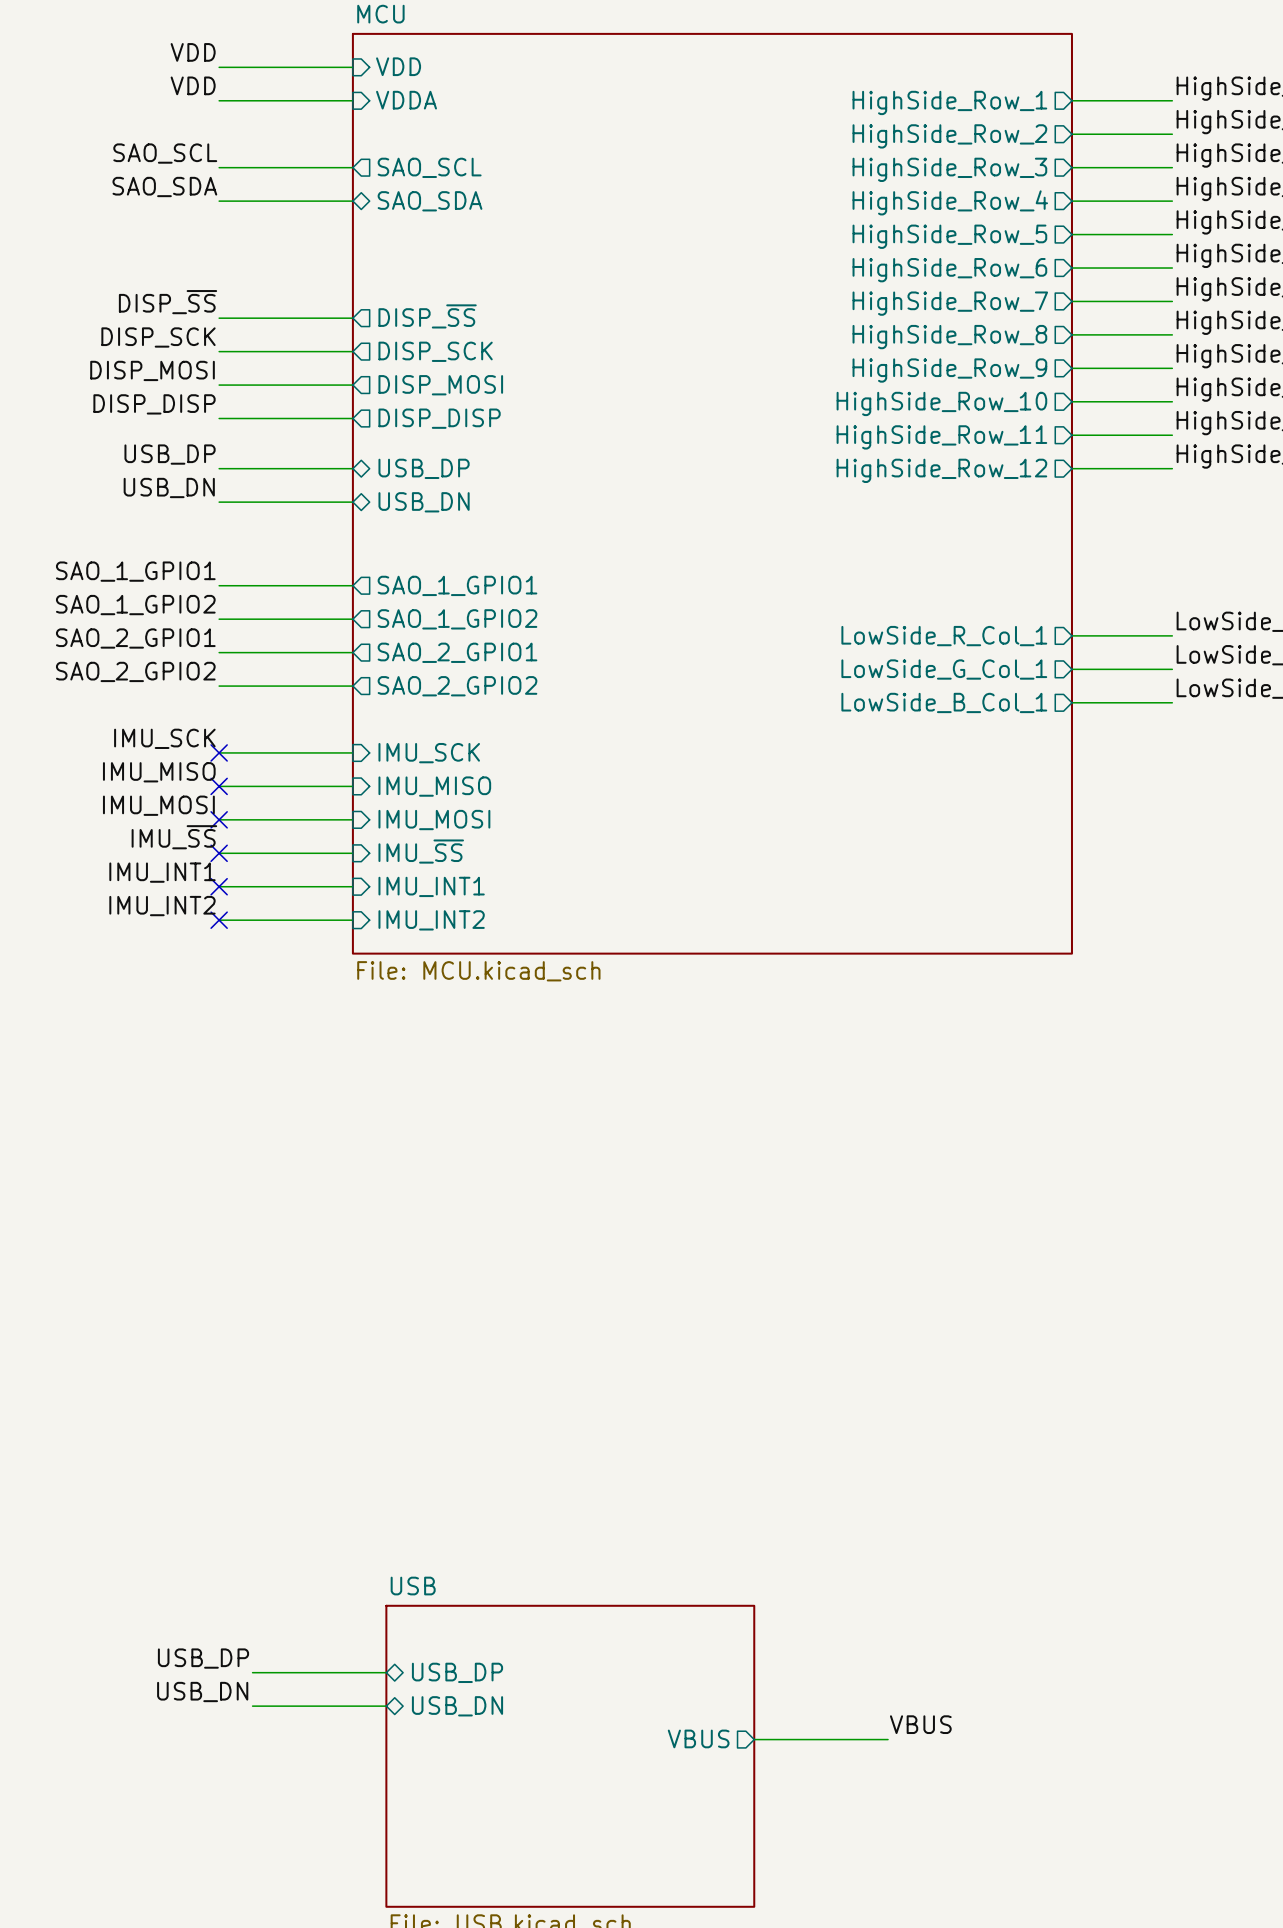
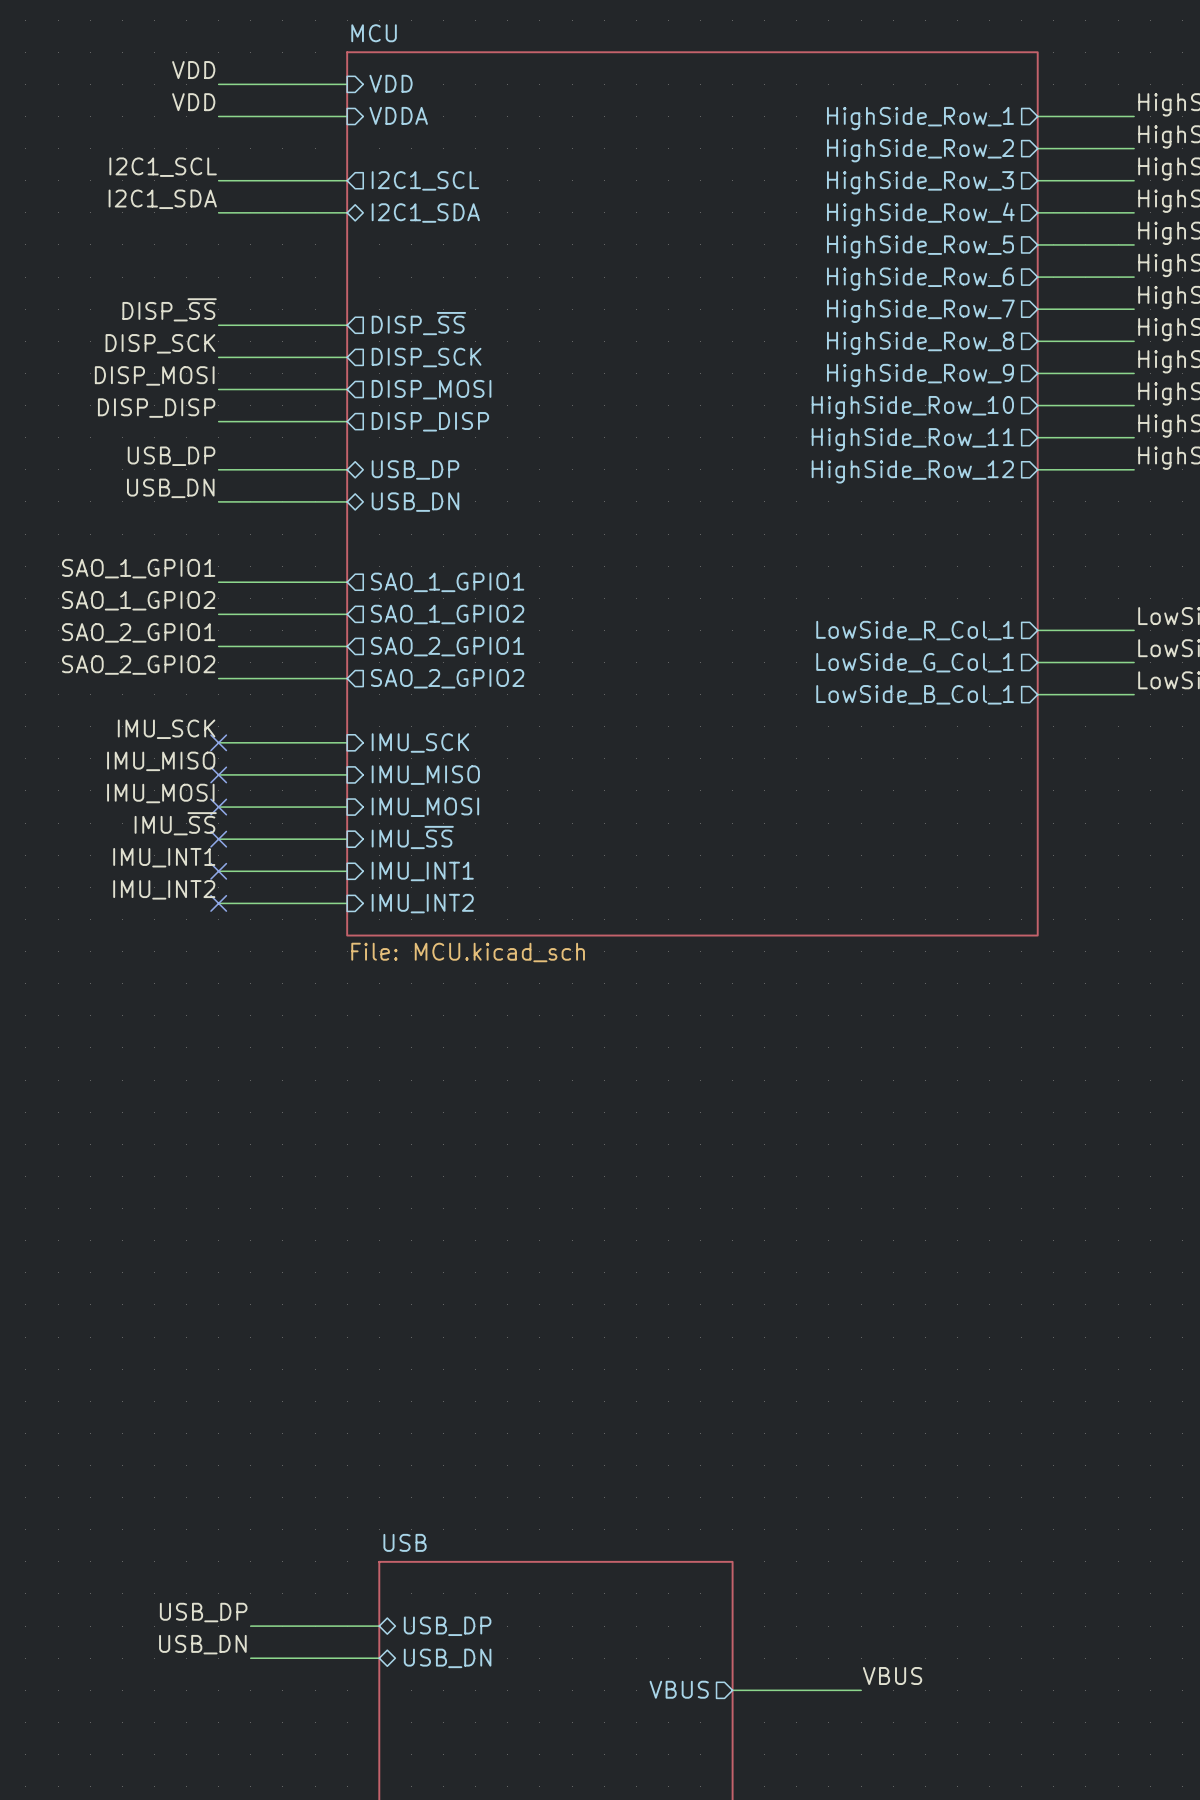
label: SAO_SCL (165, 153) -> I2C1_SCL (163, 167)
sheet pin: SAO_SCL (429, 167) -> I2C1_SCL (425, 180)
label: SAO_SDA (164, 186) -> I2C1_SDA (162, 199)
sheet pin: SAO_SDA (430, 201) -> I2C1_SDA (425, 213)

